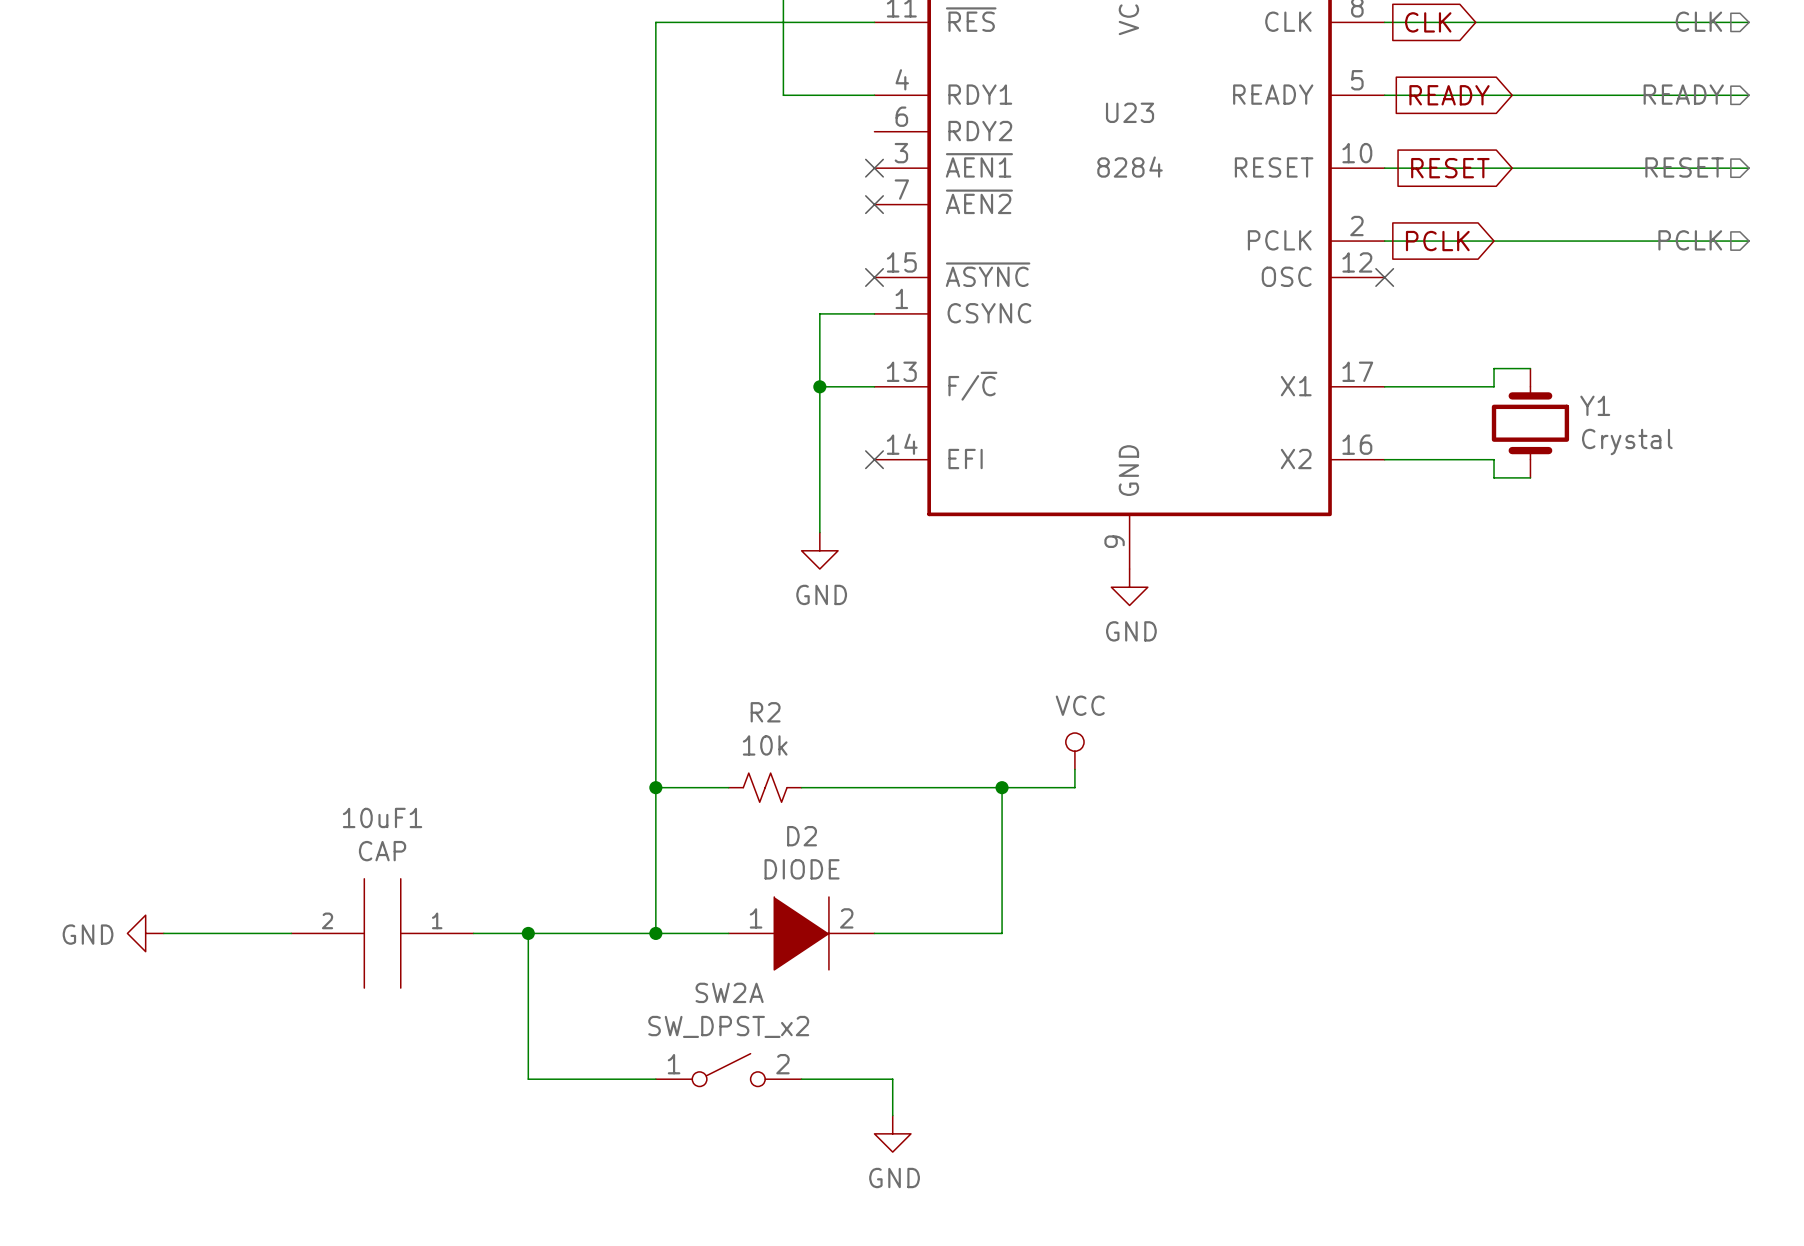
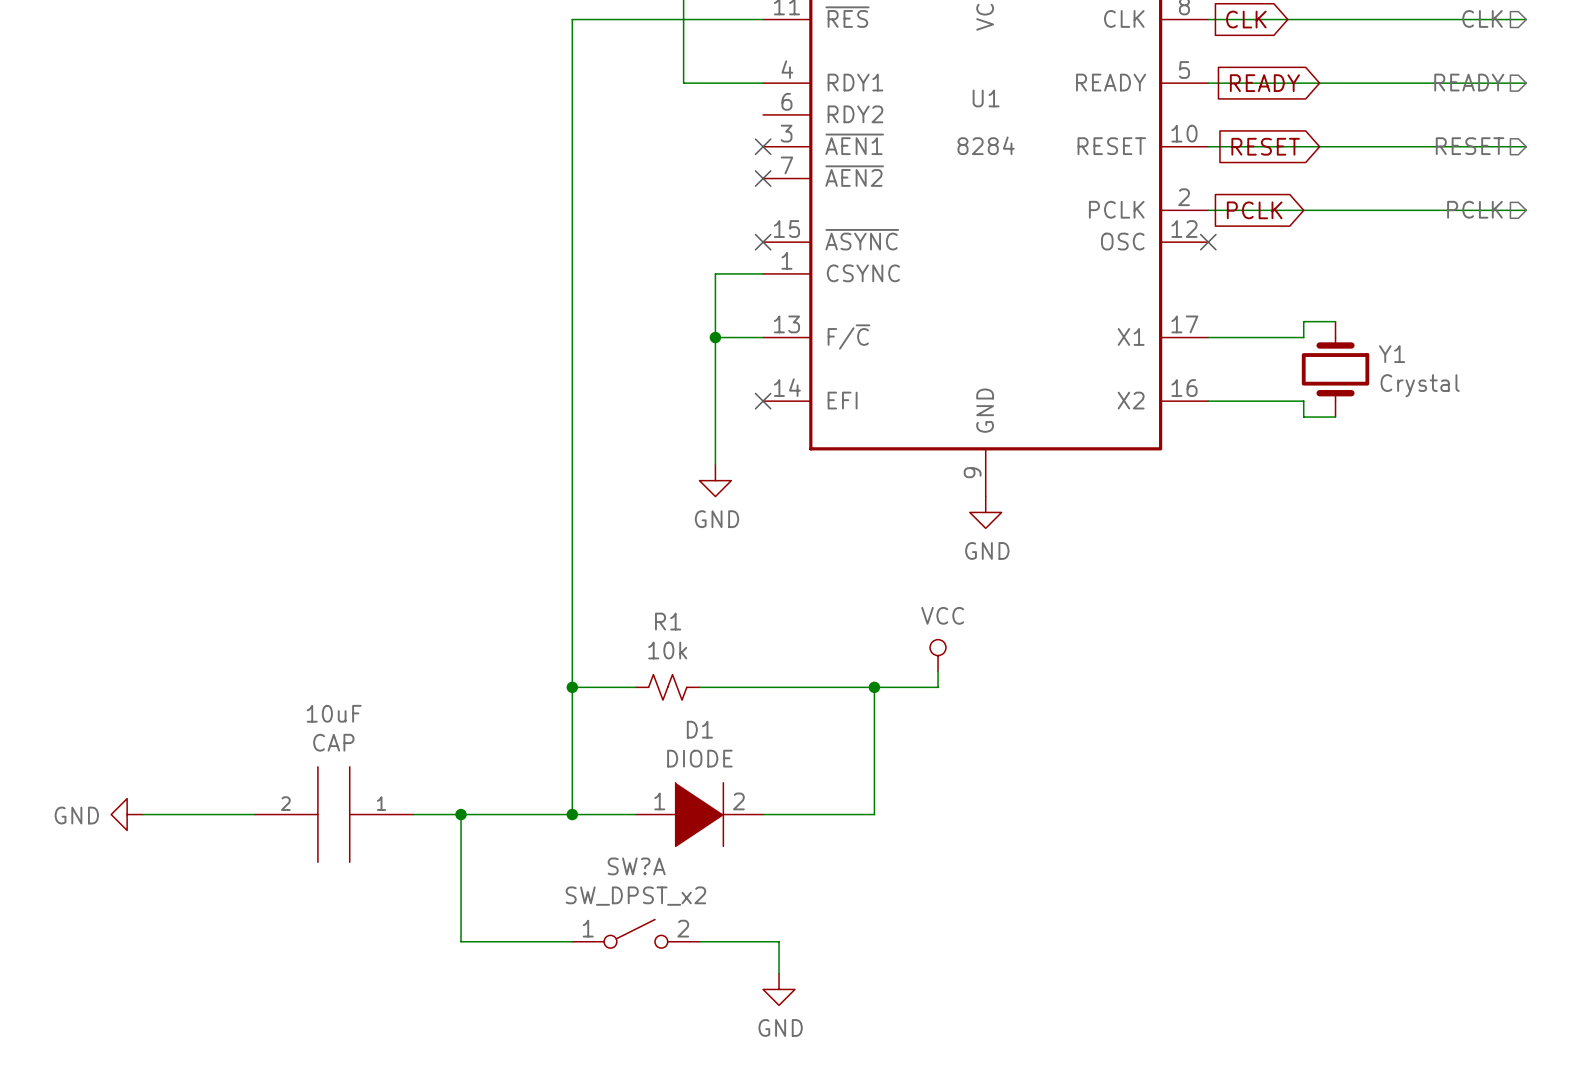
U23 name: U23 (1130, 112) -> U1 (986, 98)
R2 name: R2 (765, 712) -> R1 (668, 621)
10uF1 name: 10uF1 (382, 817) -> 10uF (334, 713)
D2 name: D2 (802, 836) -> D1 (699, 729)
SW2A name: SW2A (729, 992) -> SW?A (636, 866)

